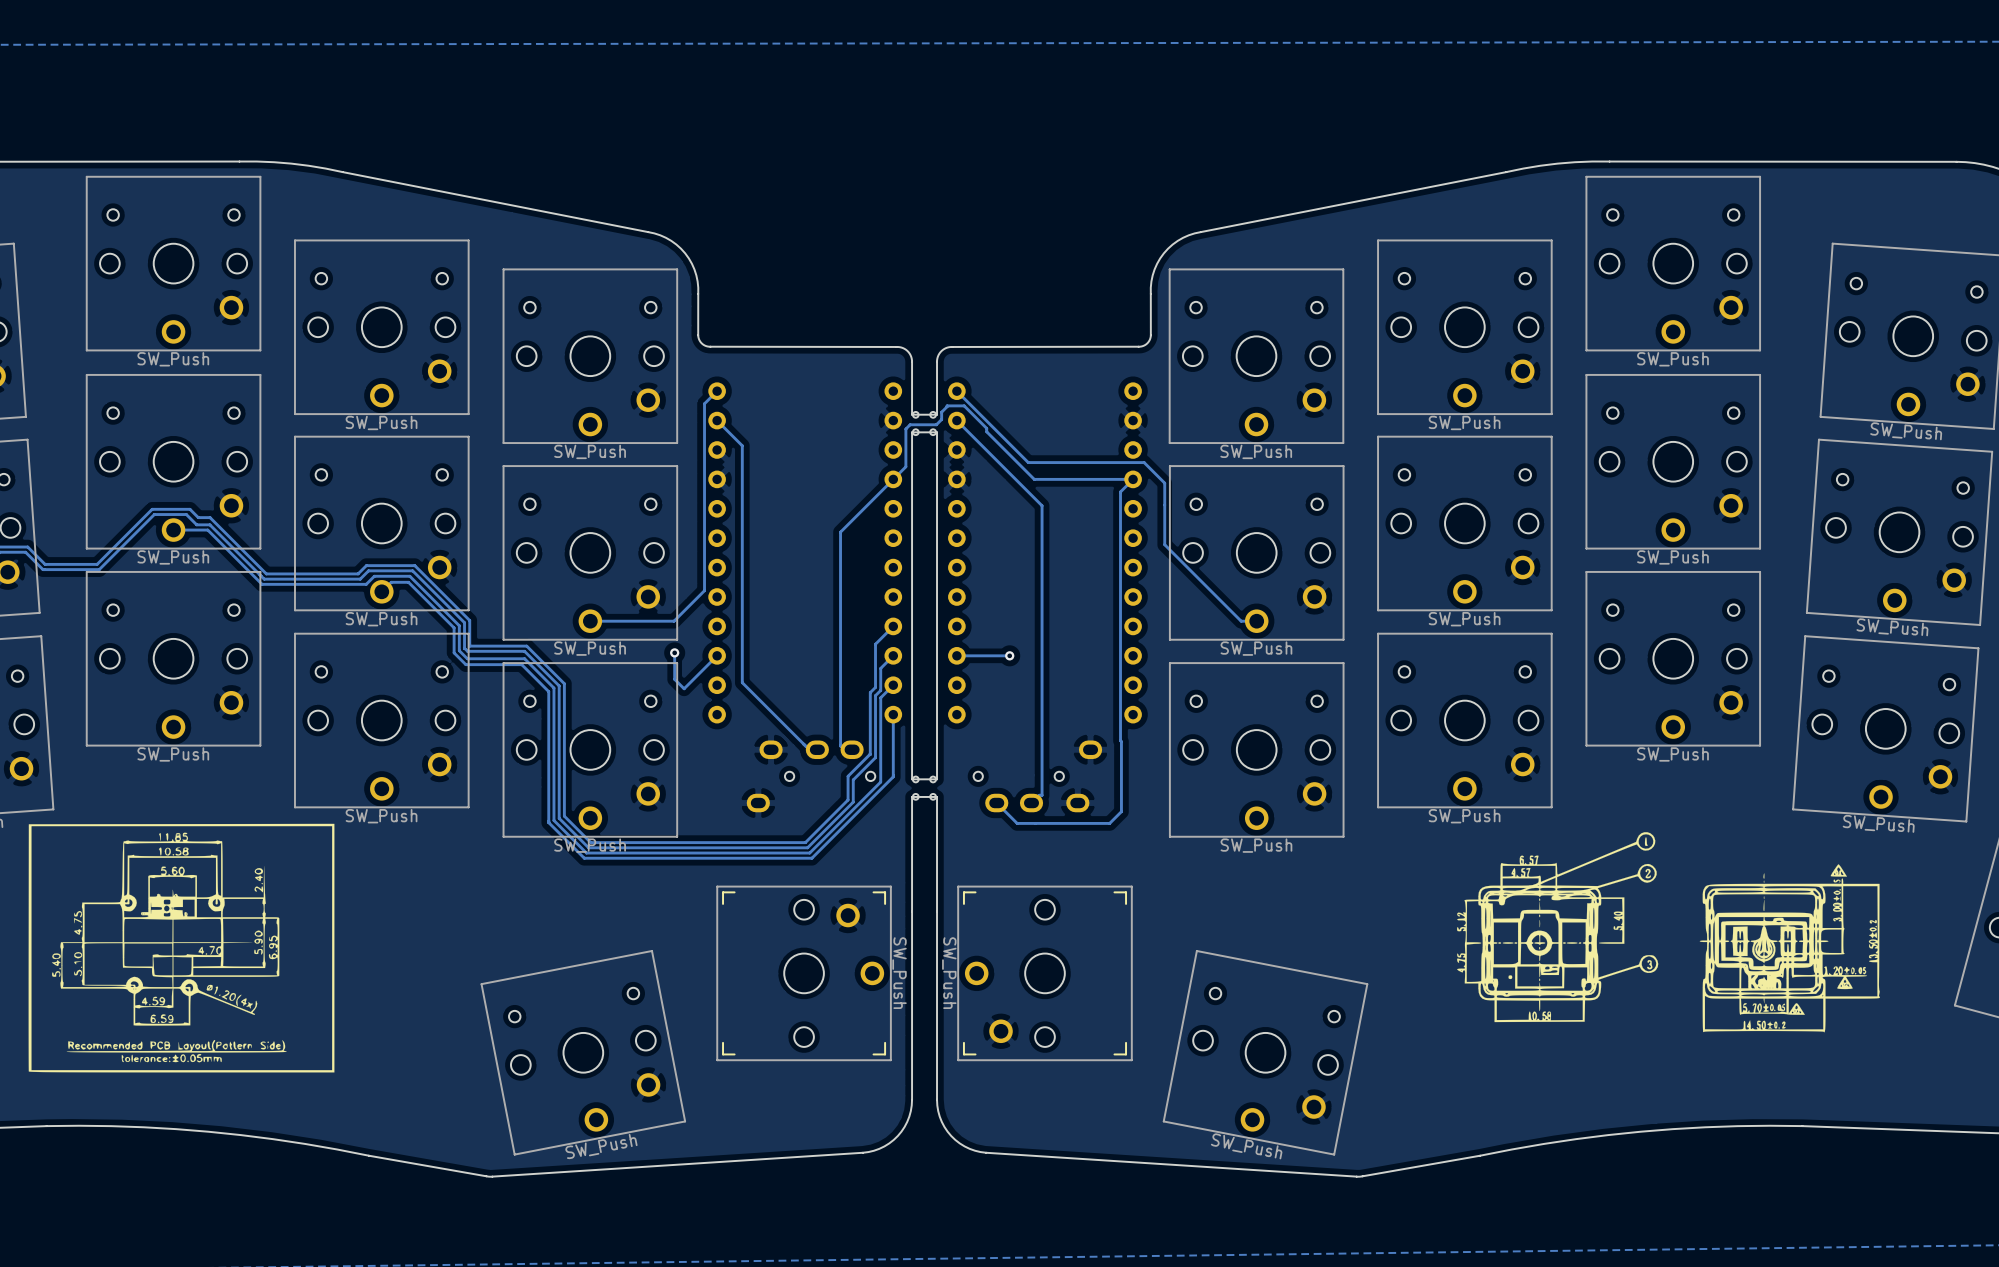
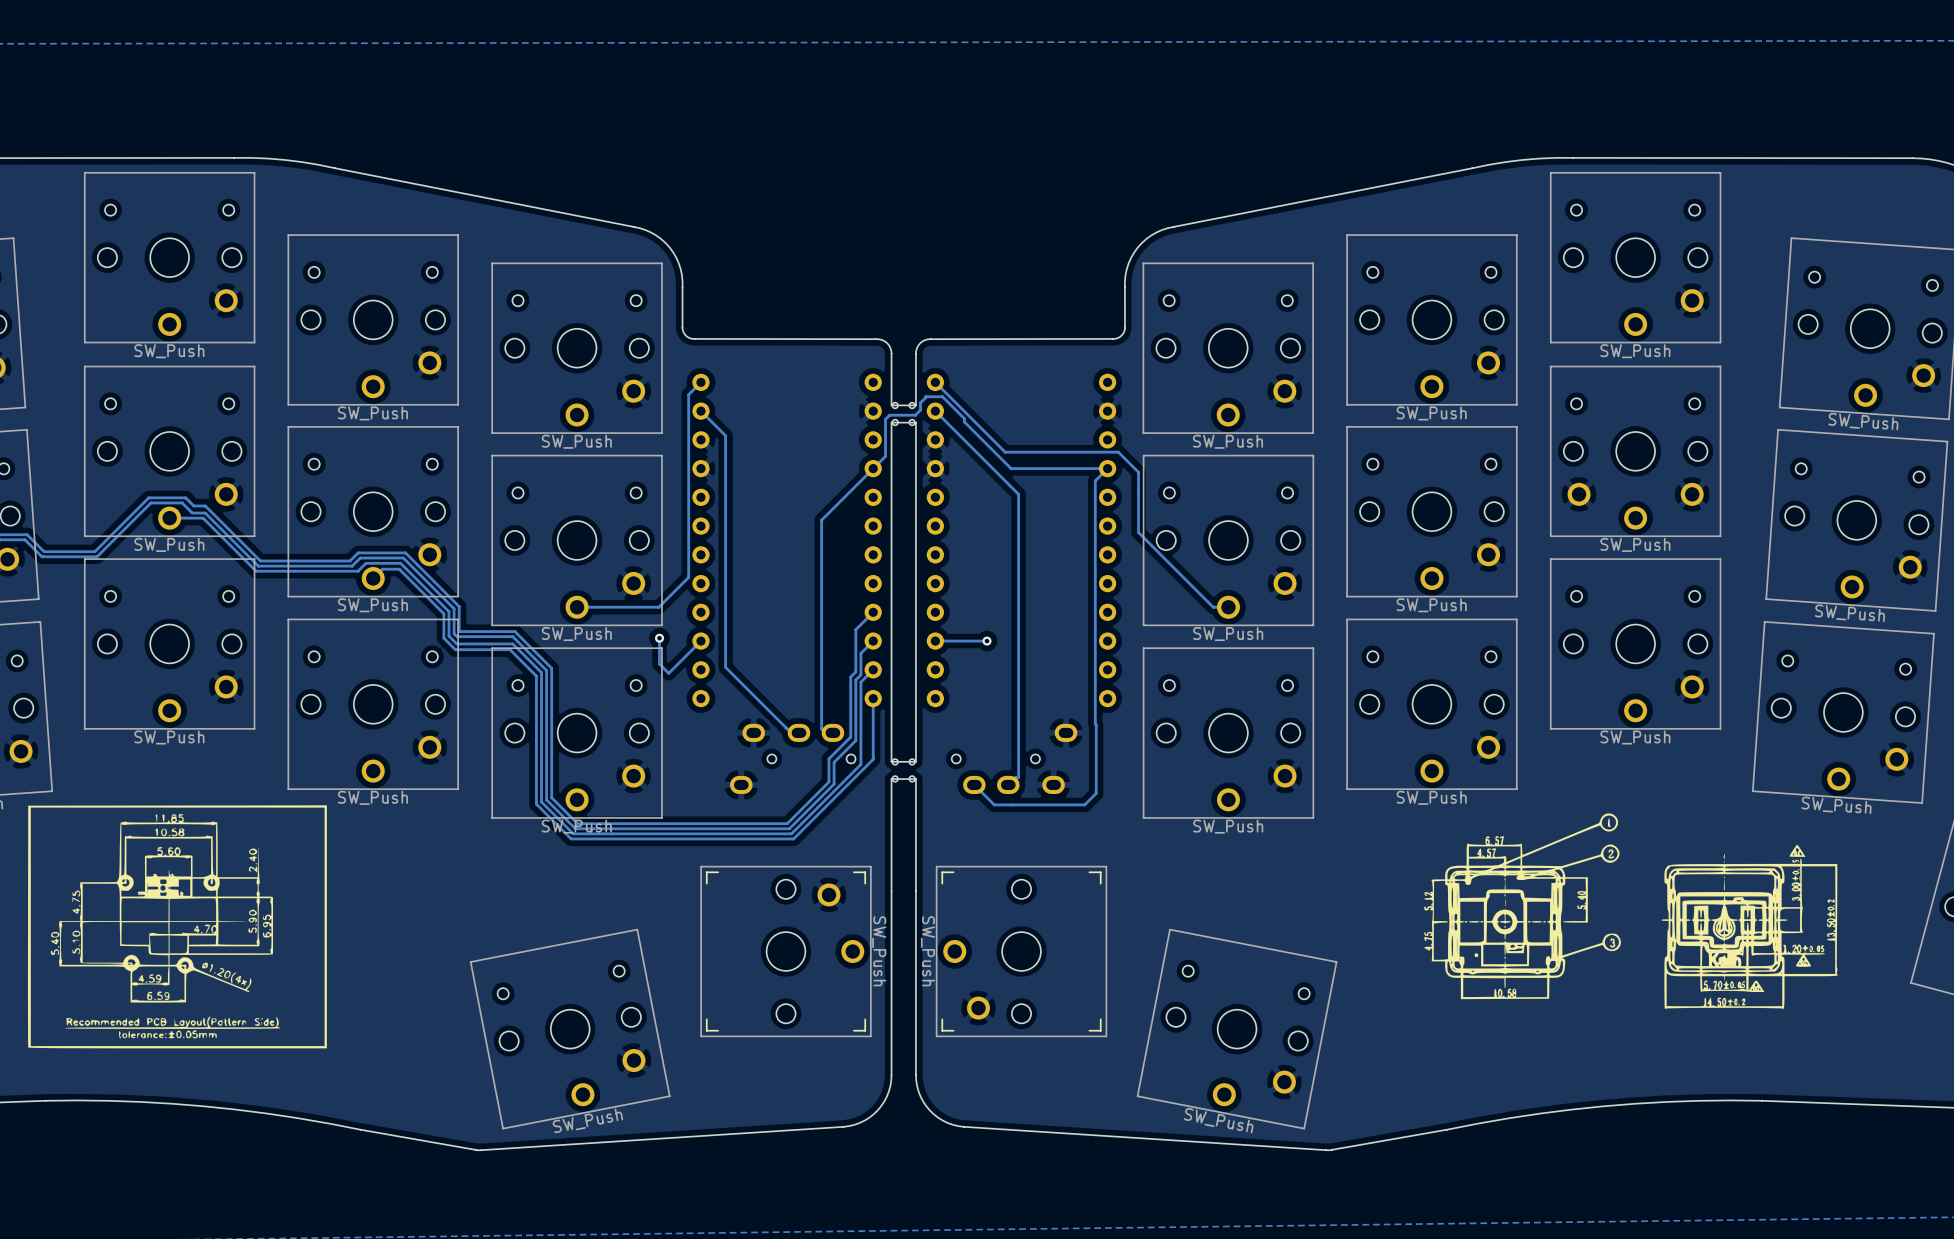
part footprint: [1585, 374, 1761, 550] -> [1549, 365, 1722, 538]

